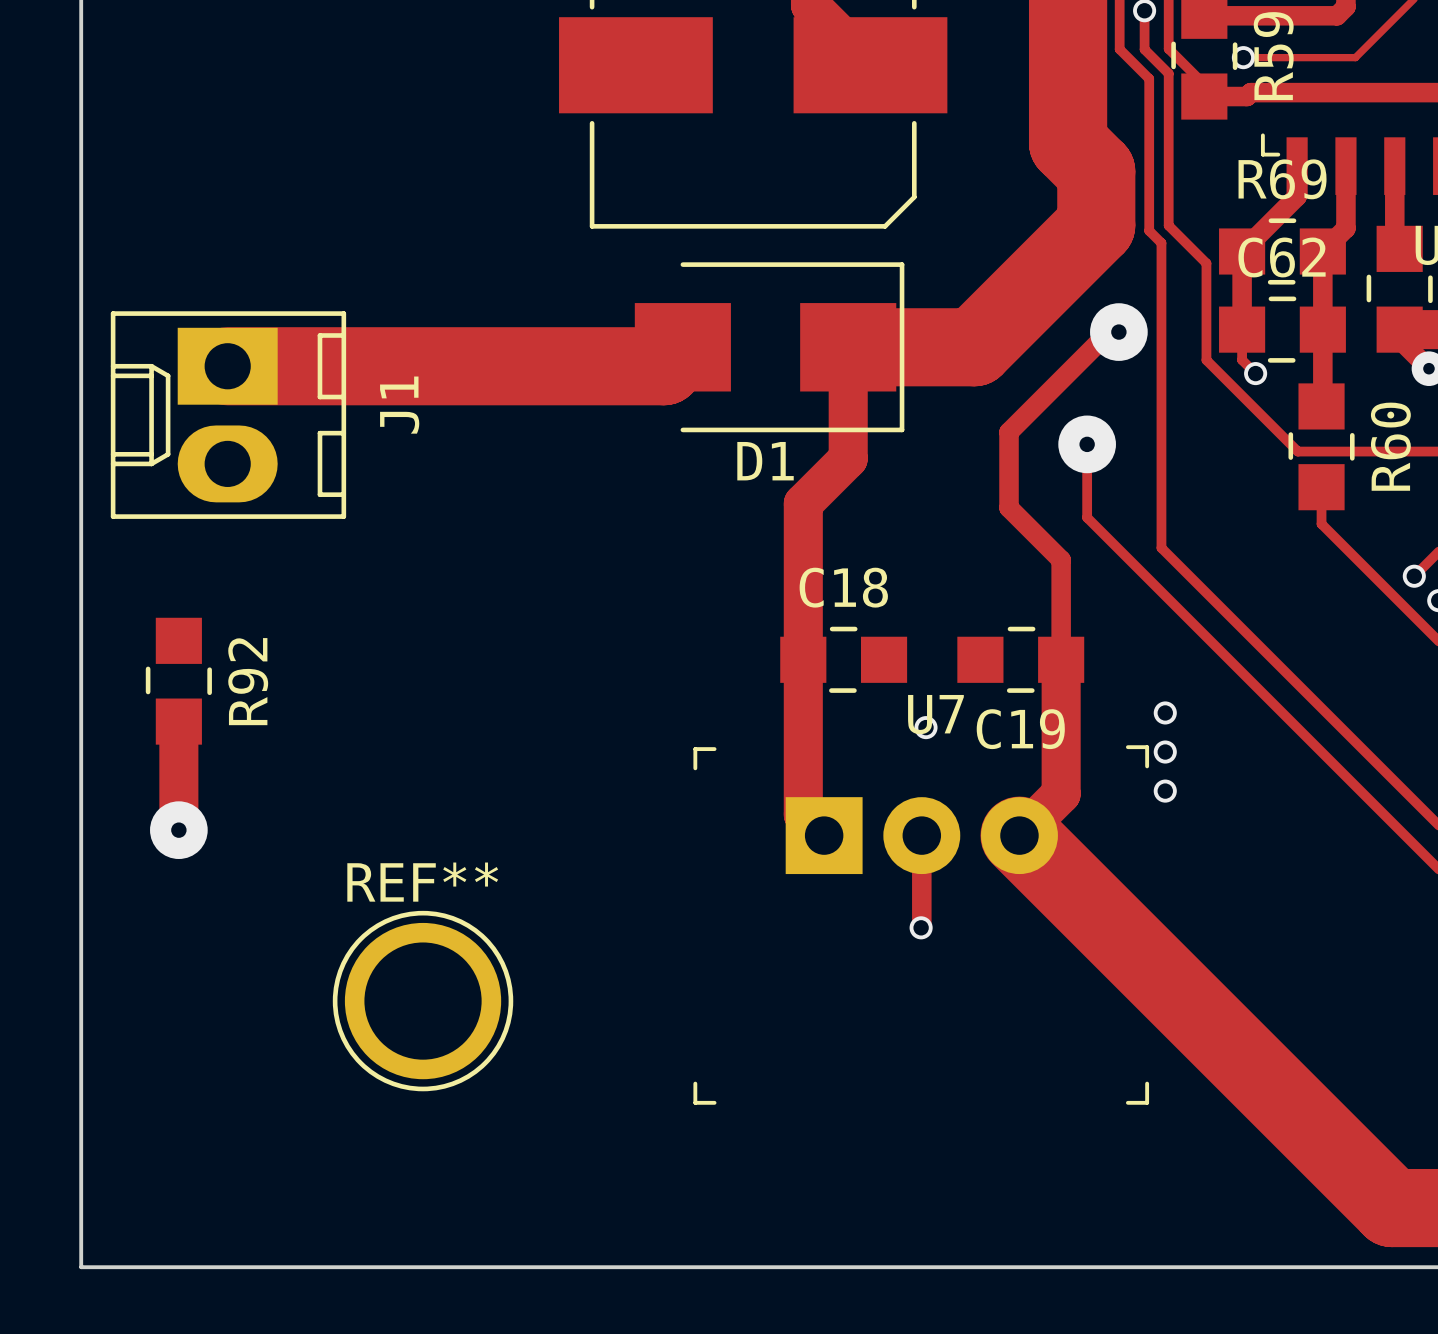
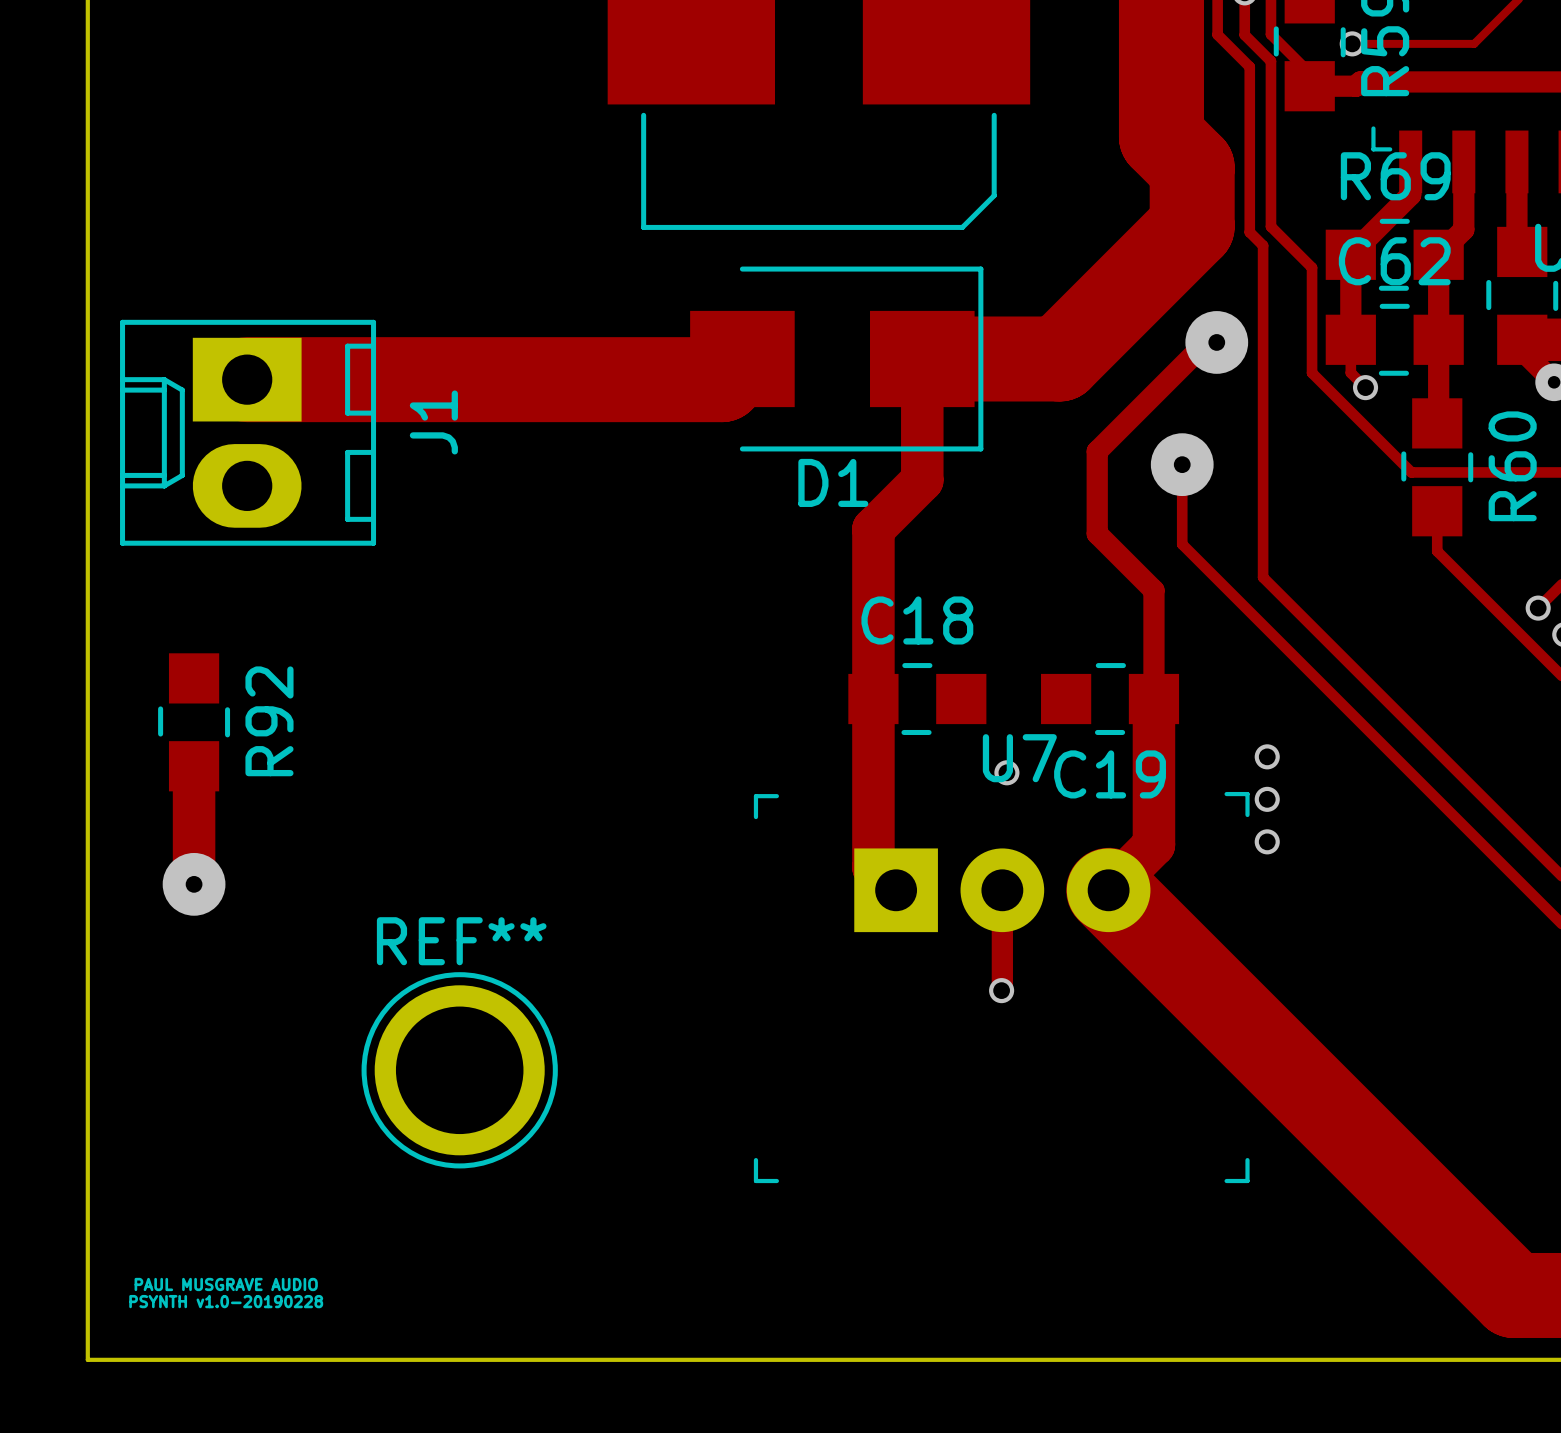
text: none -> PAUL MUSGRAVE AUDIO (226, 1284)
text: none -> PSYNTH v1.0-20190228 (226, 1301)

